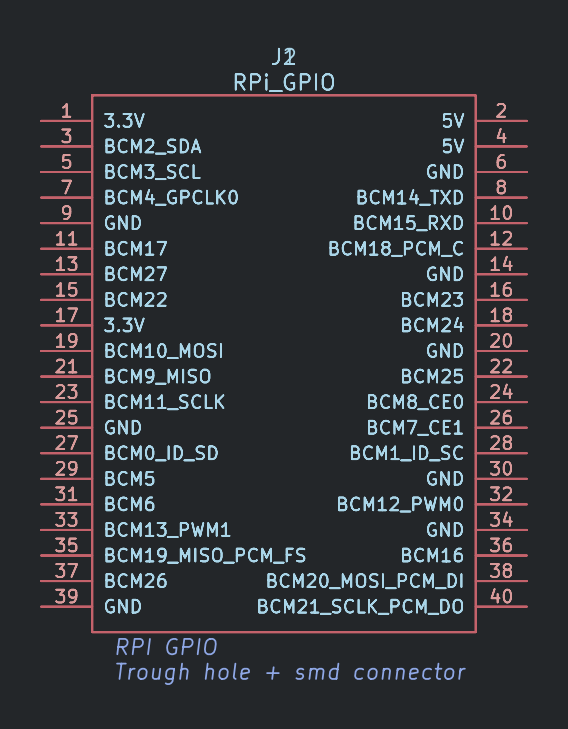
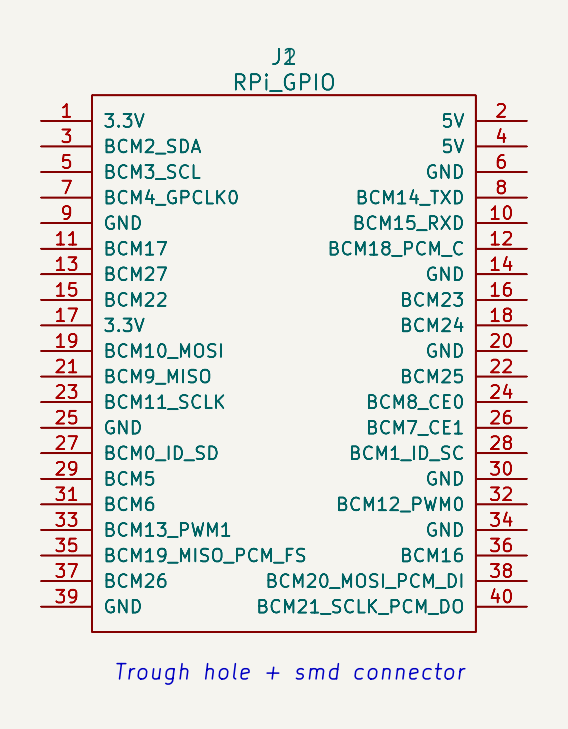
text: RPI GPIO (166, 646) -> none

